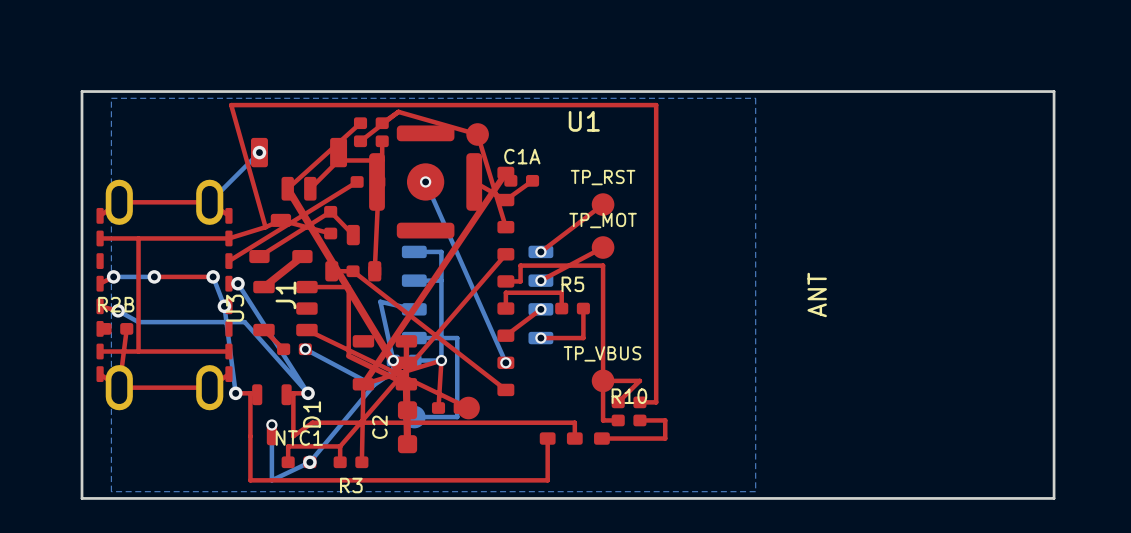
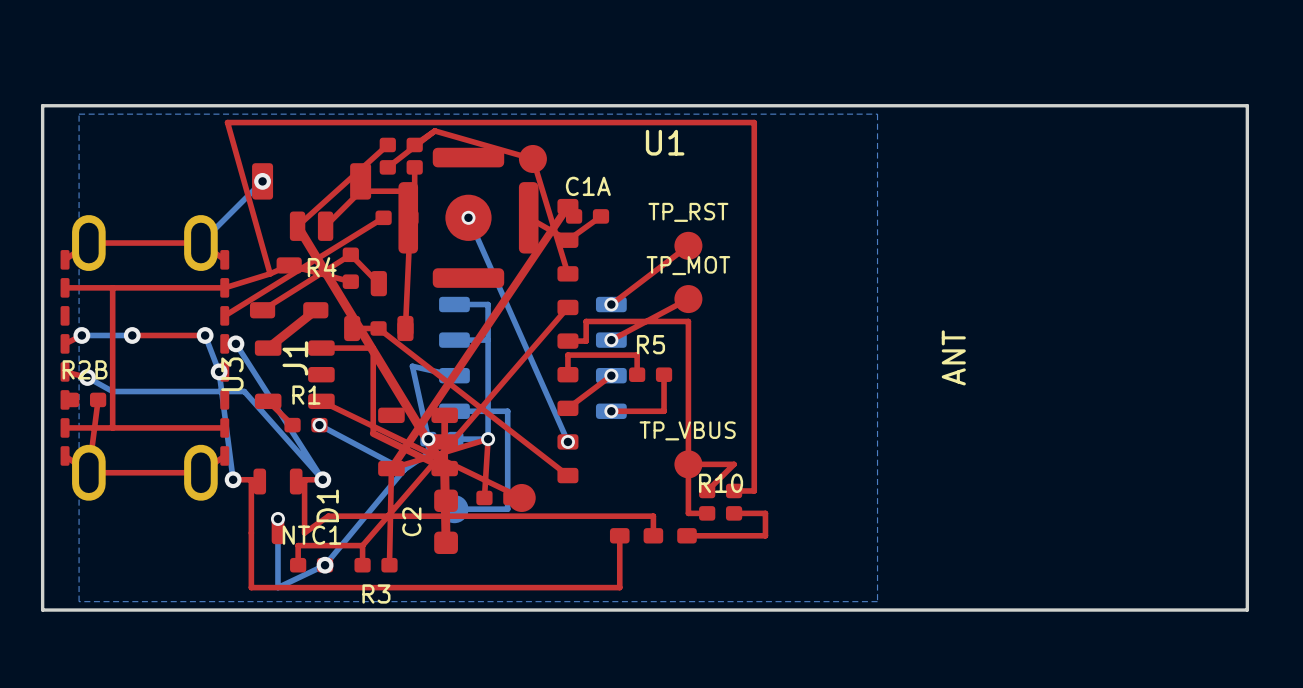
R4 name: none -> R4 (322, 267)
R1 name: none -> R1 (306, 395)

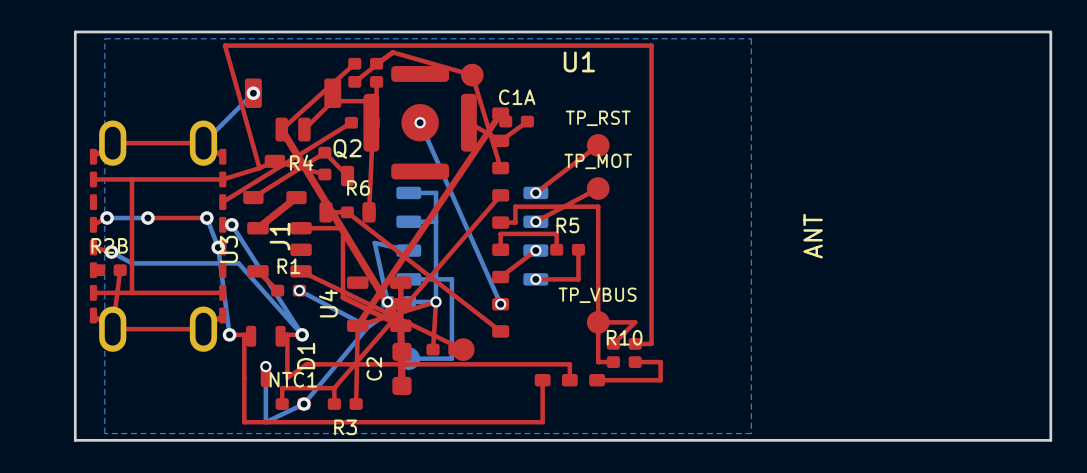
Q2 name: none -> Q2 (347, 148)
R6 name: none -> R6 (358, 188)
U4 name: none -> U4 (328, 303)

